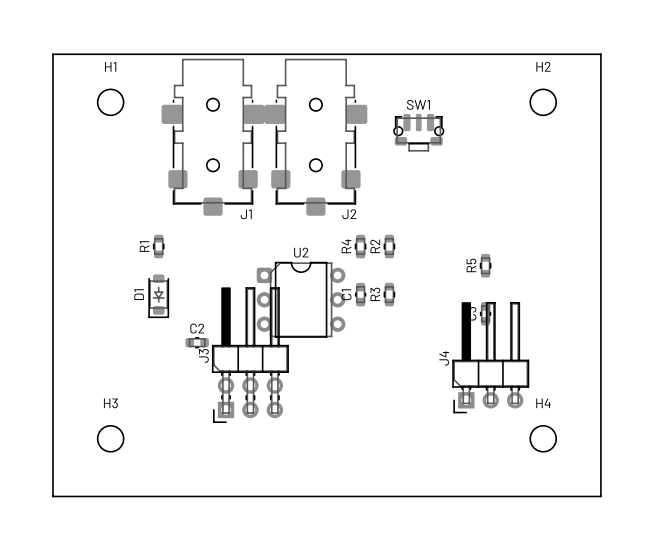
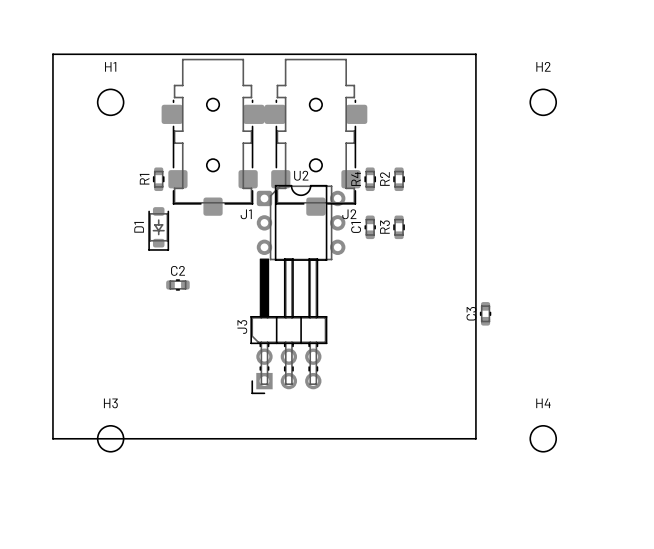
board edge: (475, 54) (600, 54) (600, 496) (52, 496) (52, 438) -> (475, 54) (475, 438) (52, 438)
SW1: (418, 132) -> none
R1 position: (158, 246) -> (158, 179)
R4 position: (360, 246) -> (370, 179)
R2 position: (389, 246) -> (399, 179)
R5: (485, 265) -> none
C1 position: (360, 294) -> (370, 227)
R3 position: (389, 294) -> (399, 227)
D1 position: (158, 296) -> (158, 228)
U2 position: (301, 299) -> (301, 222)
C2 position: (197, 342) -> (177, 284)
J3 position: (250, 355) -> (288, 326)
J4: (490, 357) -> none

